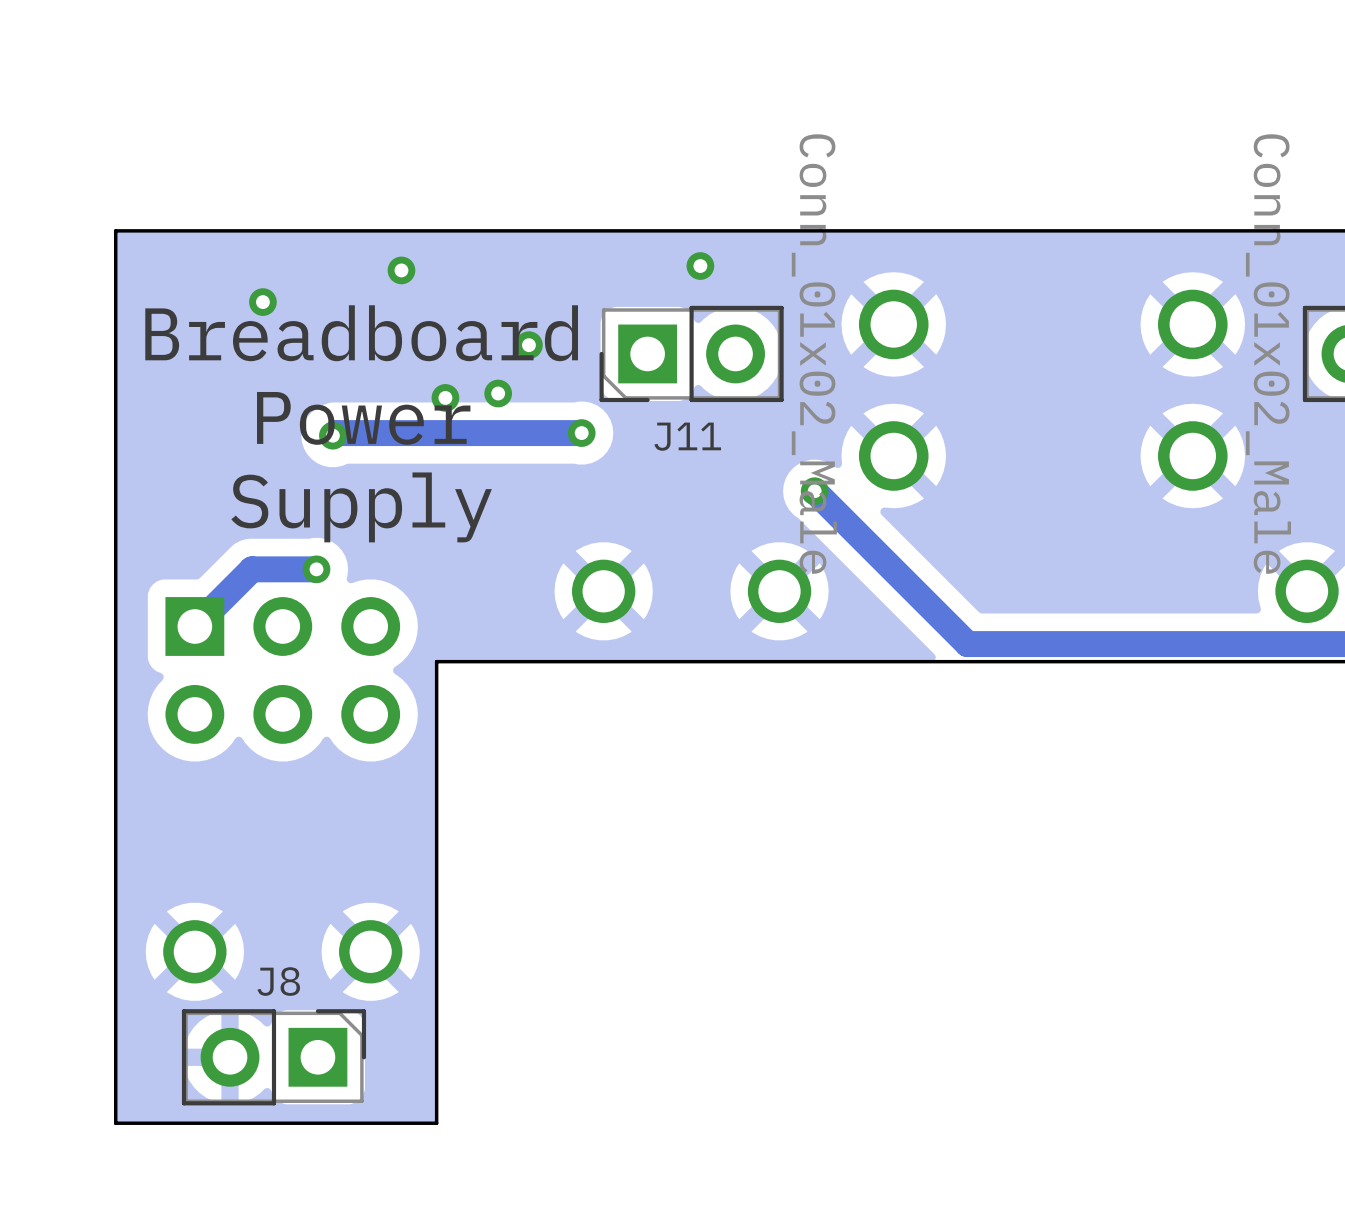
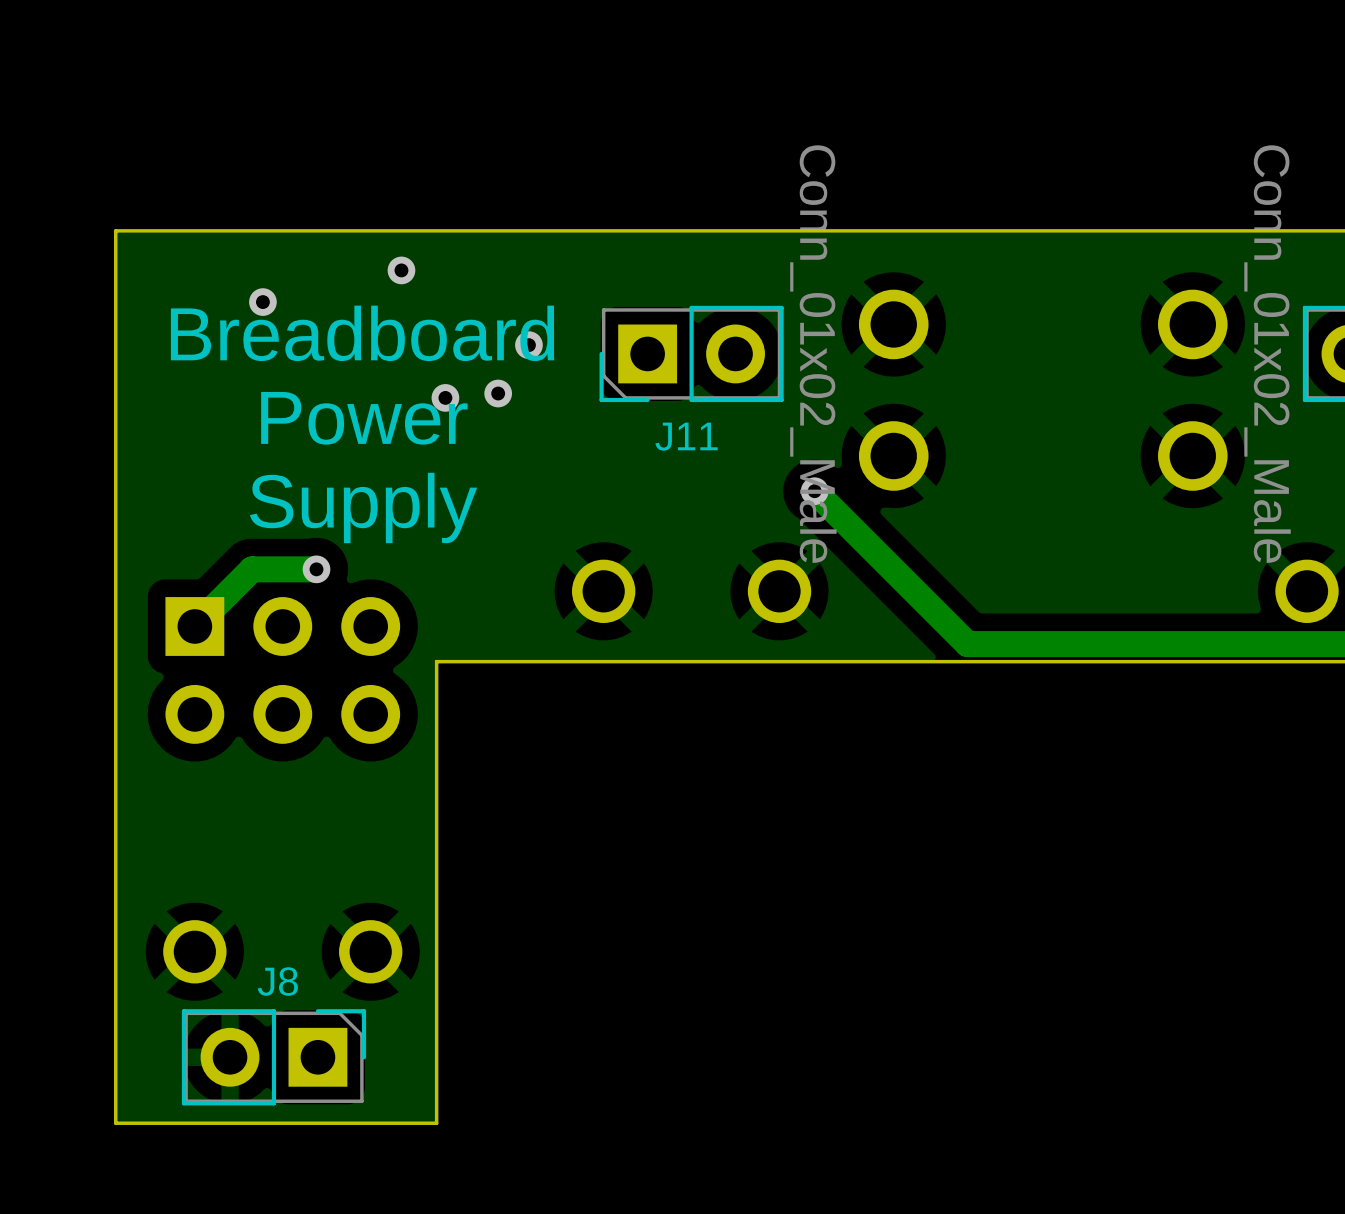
via: (700, 266) -> none
track: (581, 433) (335, 433) (332, 435) -> none
via: (581, 433) -> none
via: (332, 435) -> none

